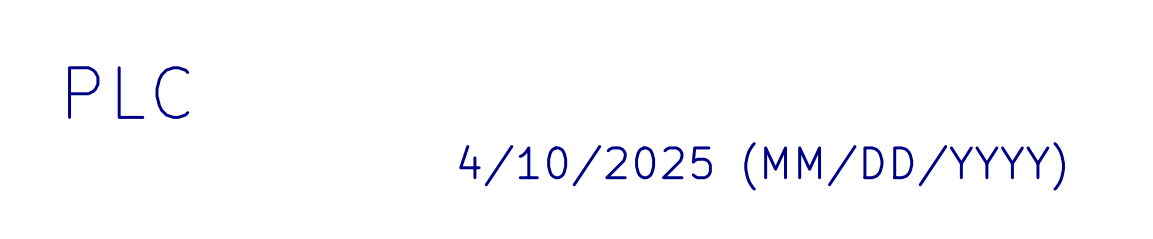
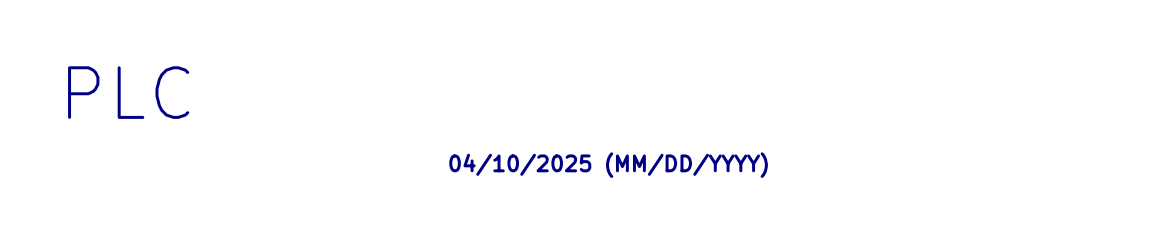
text: 4/10/2025 (MM/DD/YYYY) (762, 166) -> 04/10/2025 (MM/DD/YYYY) (608, 165)

